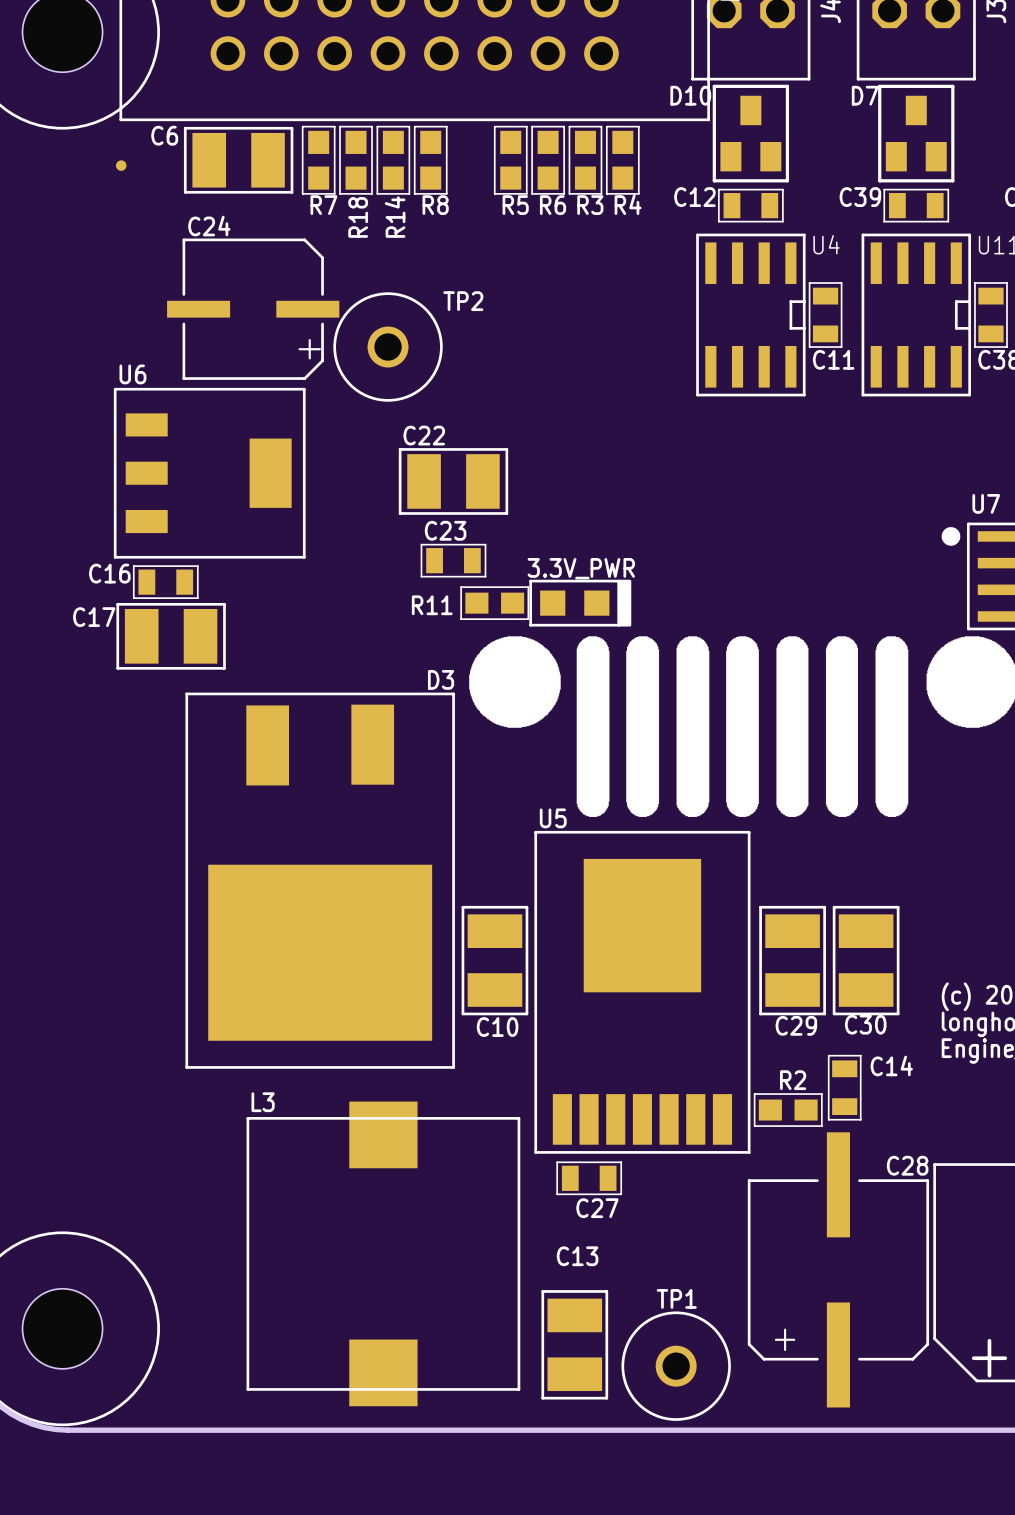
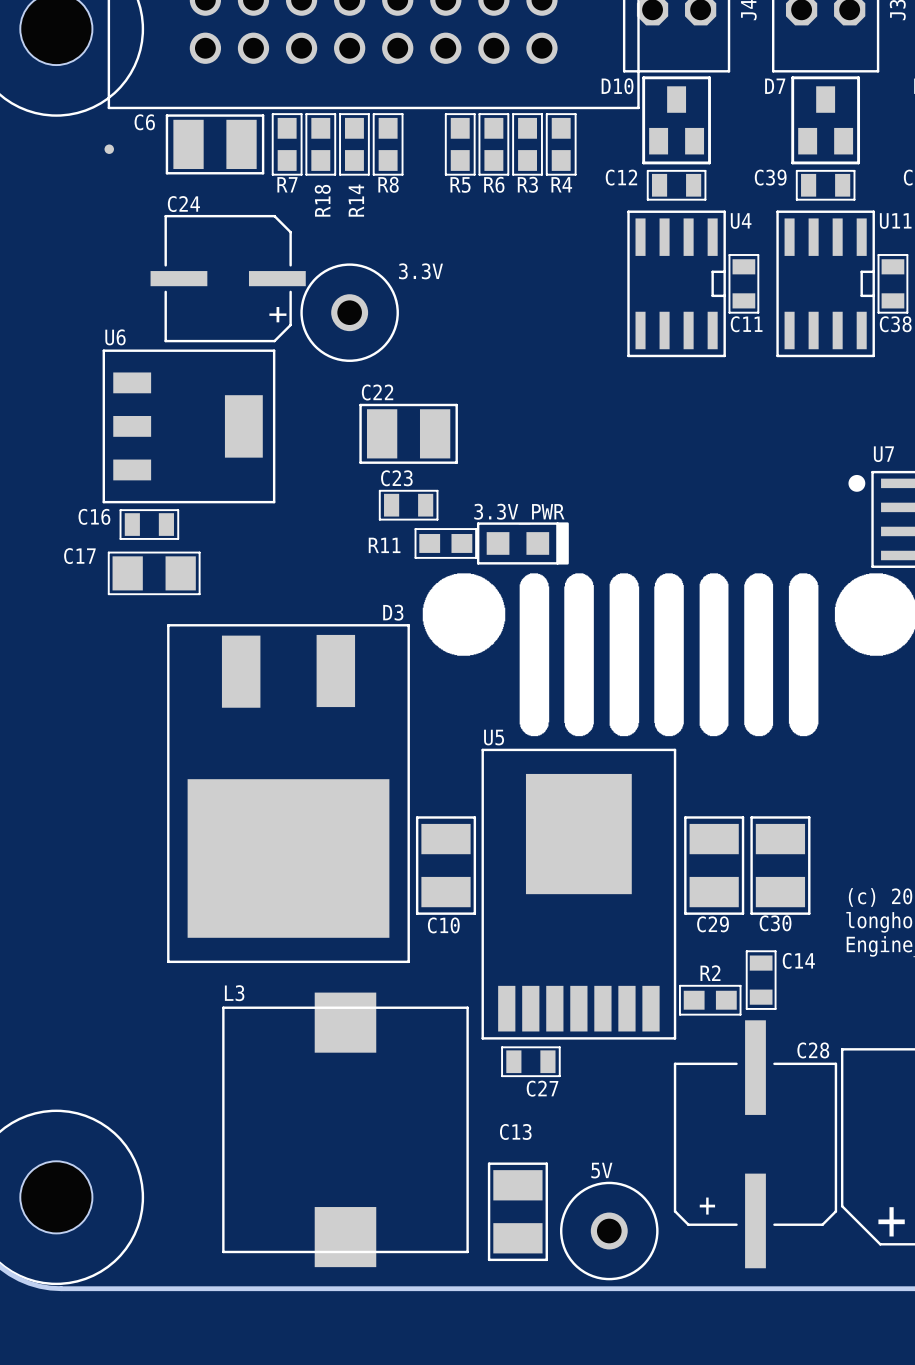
TP2 name: TP2 (463, 301) -> 3.3V (420, 271)
C17 footprint: [116, 602, 226, 670] -> [108, 552, 201, 595]
TP1 name: TP1 (676, 1298) -> 5V (601, 1170)

